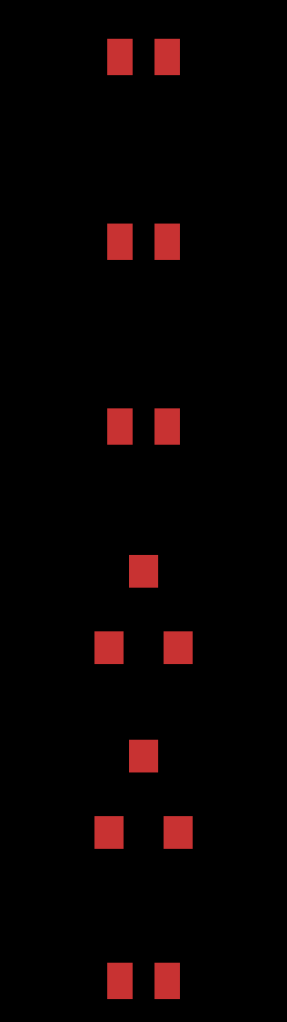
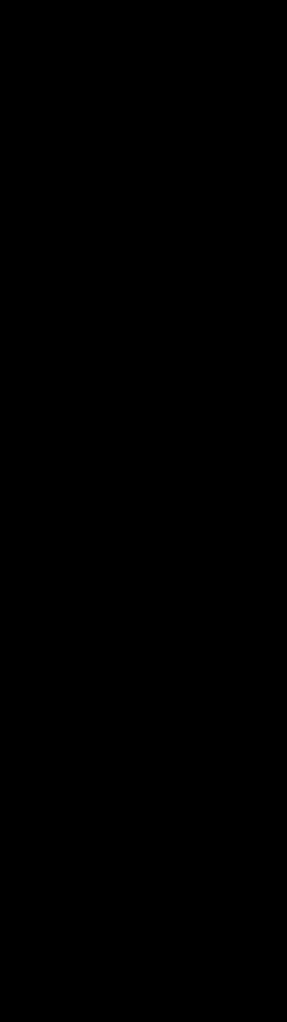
part: (143, 56) -> none
part: (143, 241) -> none
part: (143, 426) -> none
part: (143, 609) -> none
part: (143, 794) -> none
part: (143, 980) -> none

